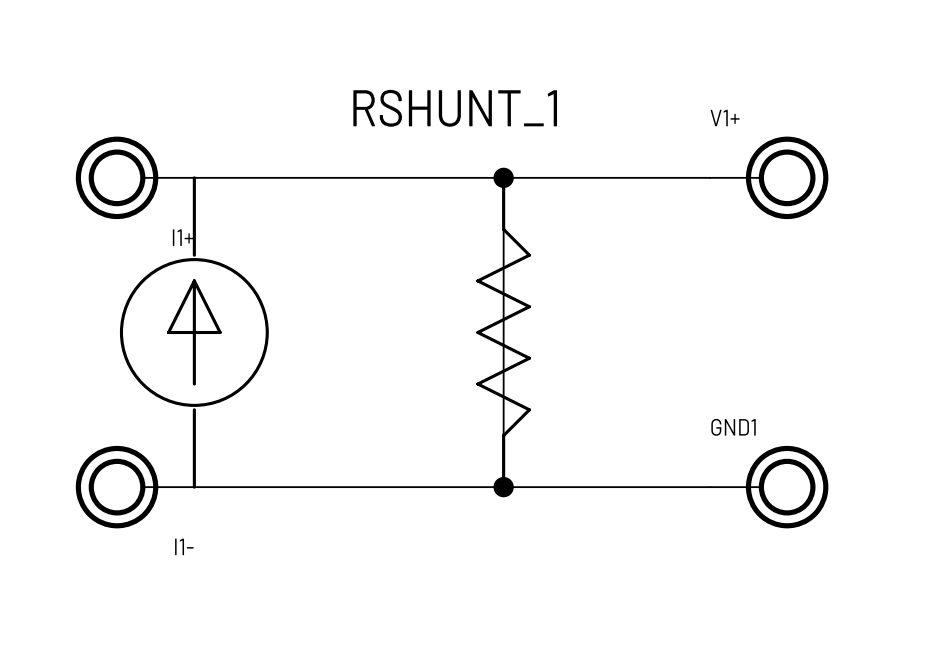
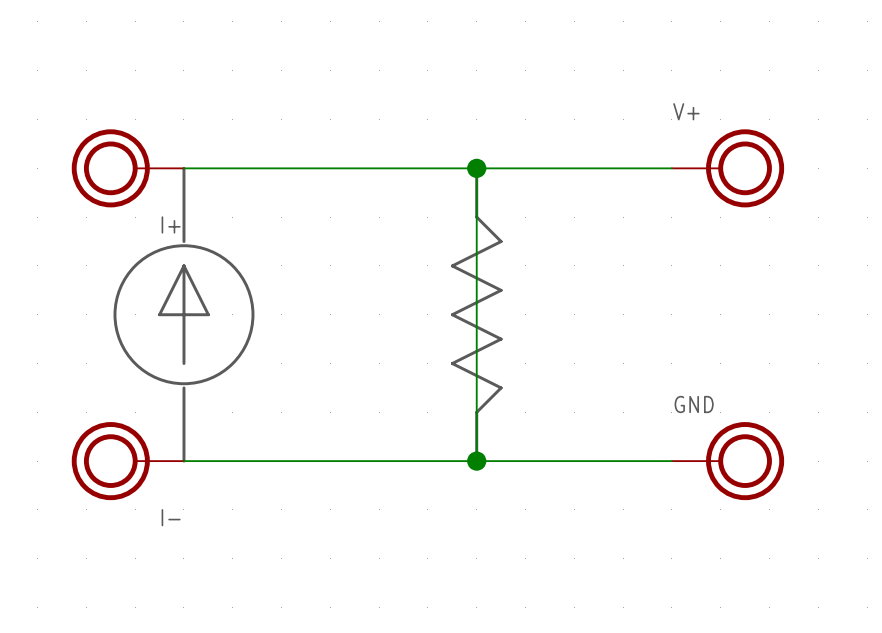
label: RSHUNT_1 (455, 108) -> none
part value: V1+ (725, 118) -> V+ (686, 111)
part value: I1+ (183, 237) -> I+ (171, 224)
part value: GND1 (733, 427) -> GND (694, 404)
part value: I1- (184, 546) -> I- (171, 517)

